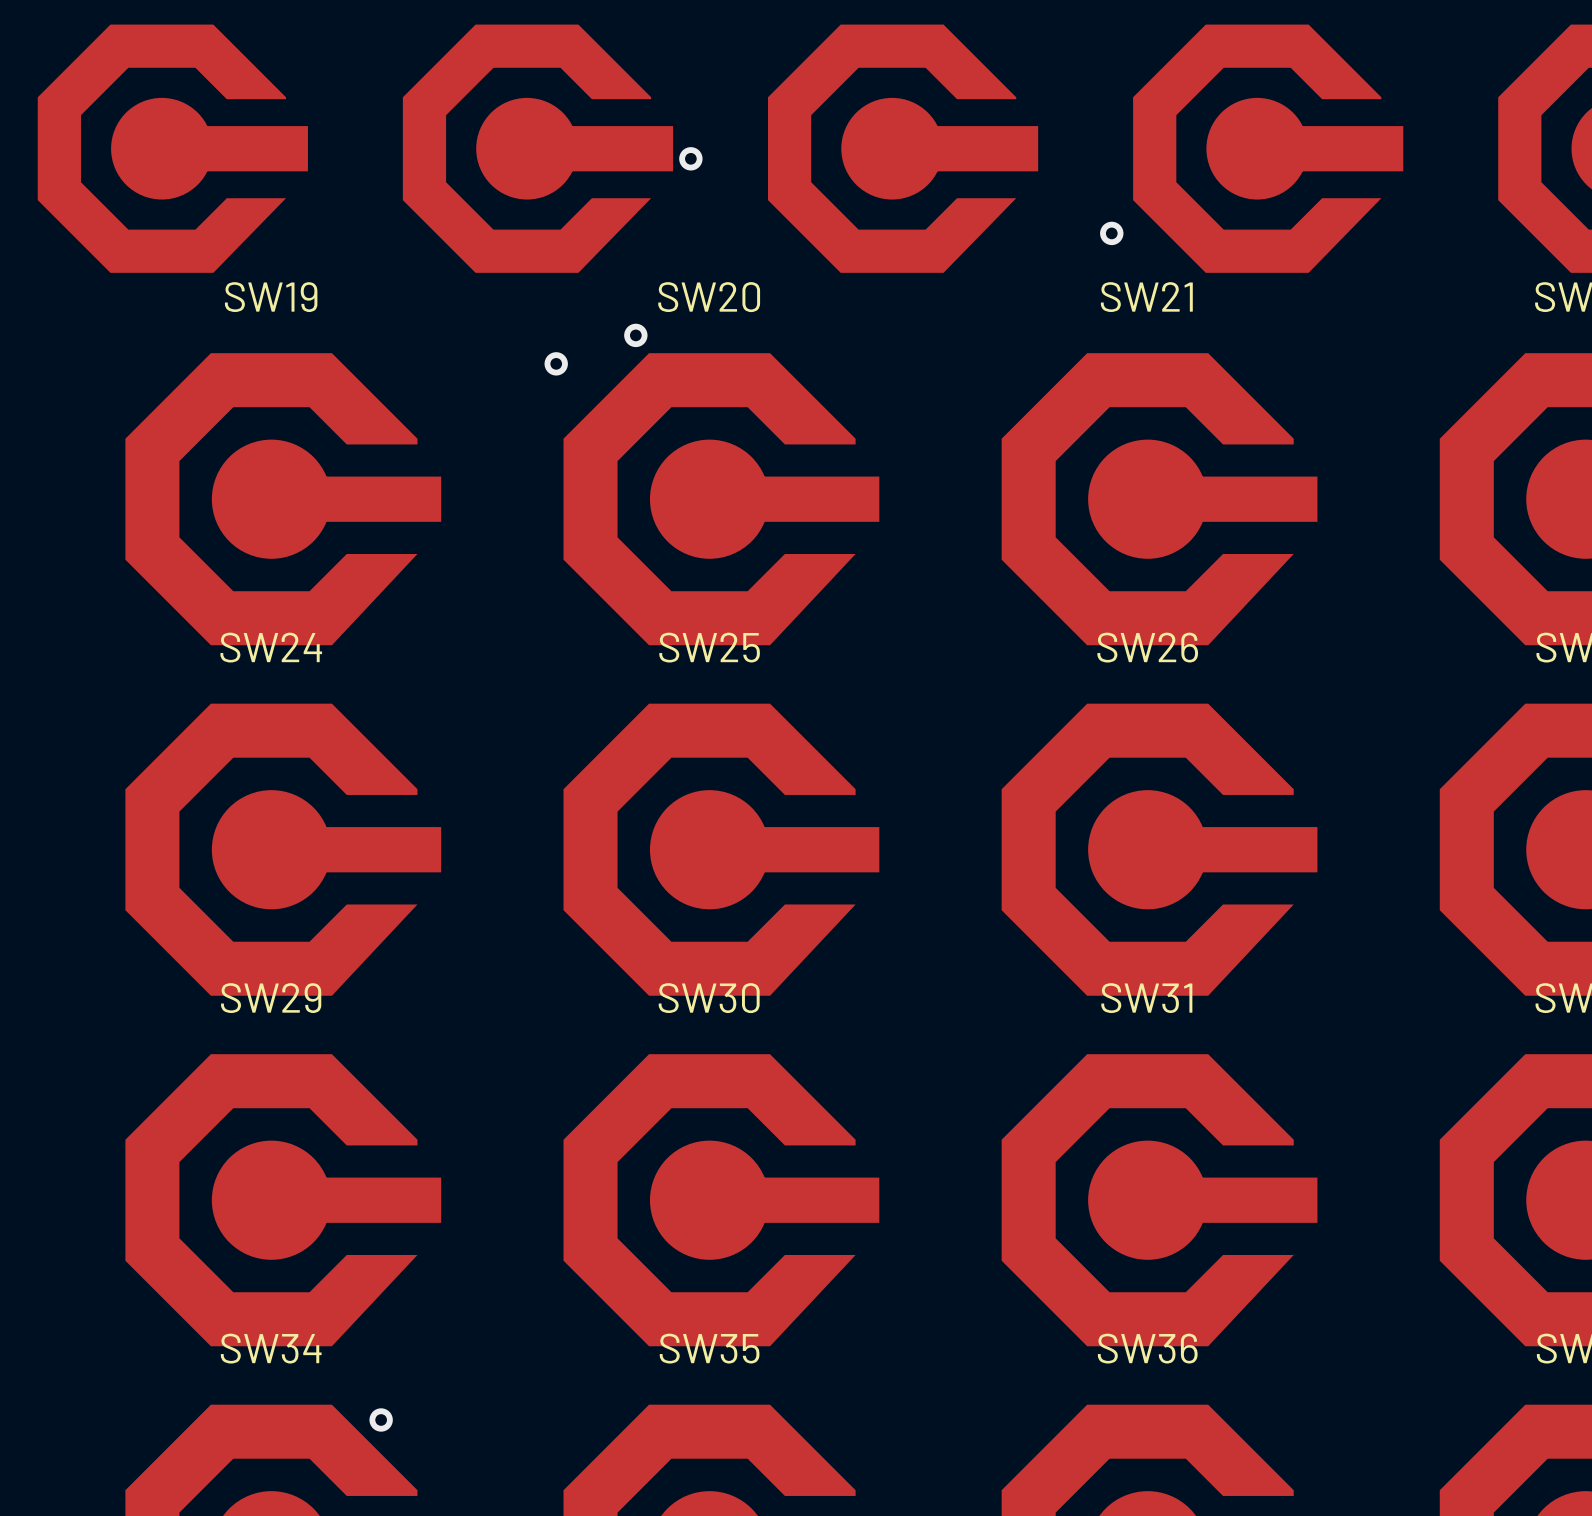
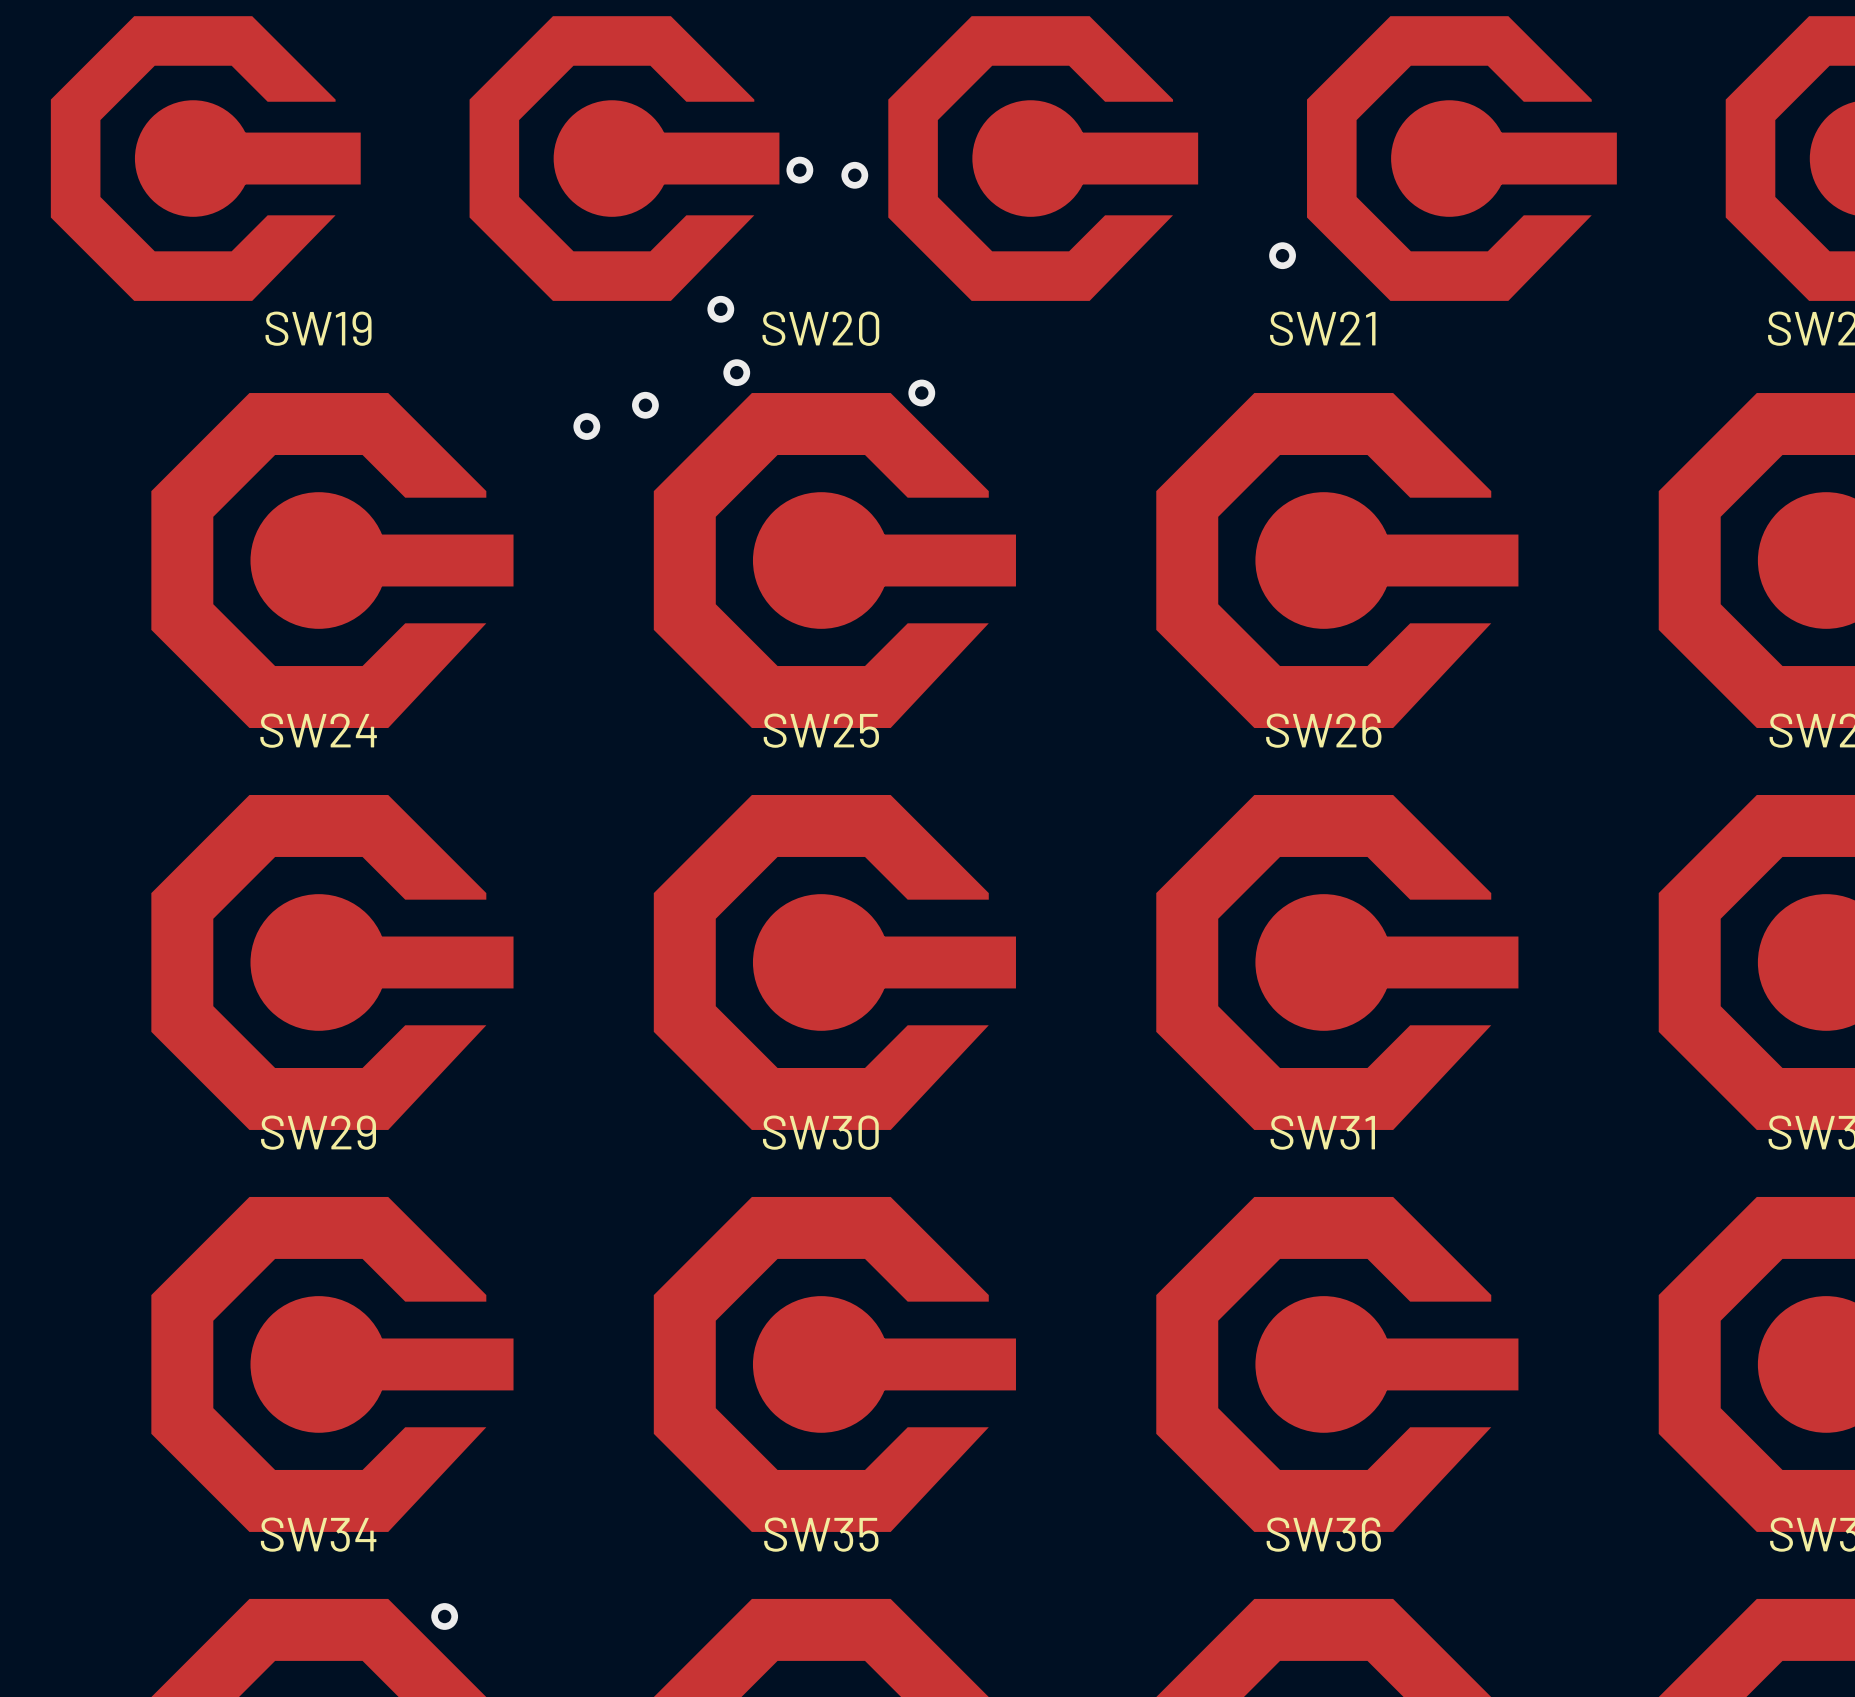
via: none -> (854, 175)
via: none -> (720, 309)
via: none -> (921, 393)
via: none -> (586, 426)

